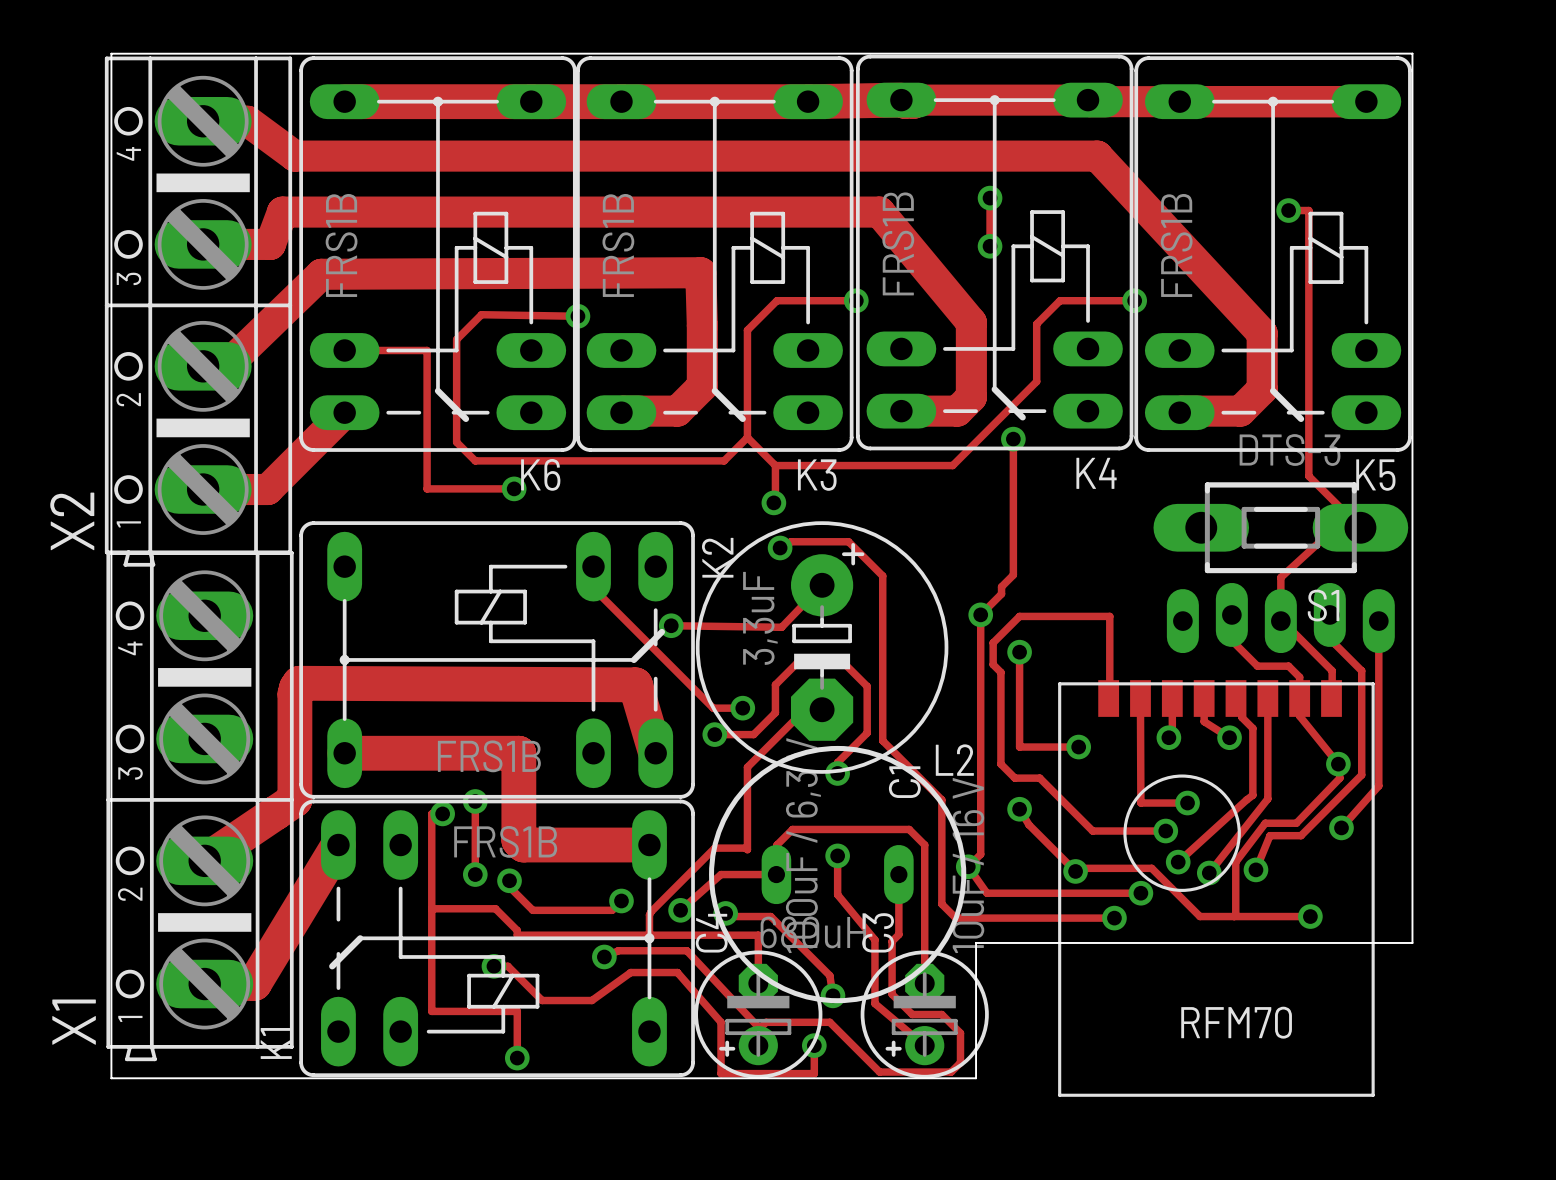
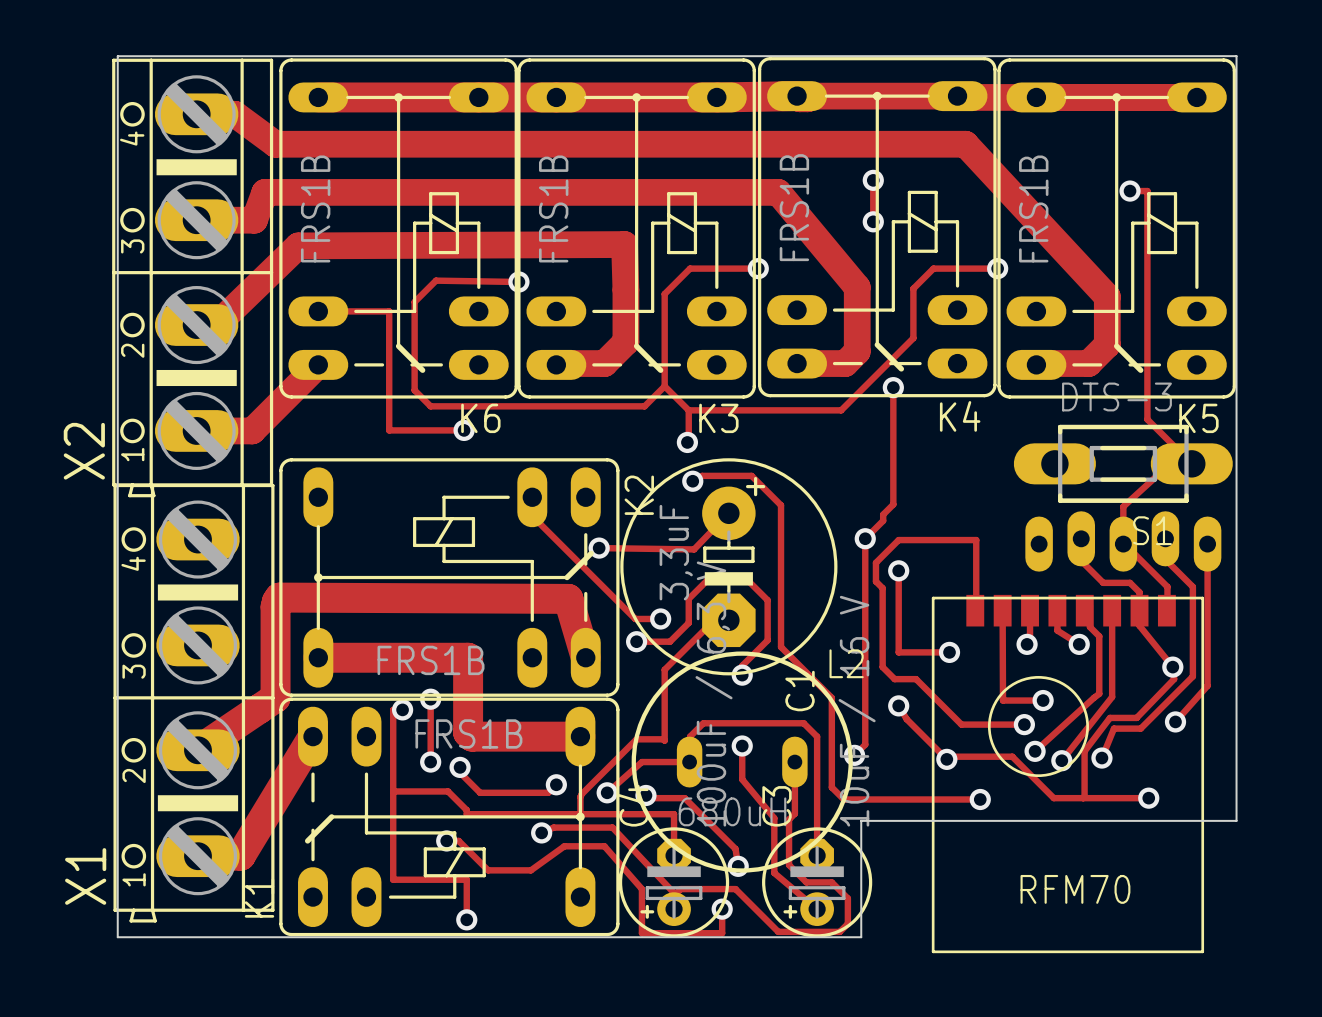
track: (968, 866) (986, 893) (1140, 893) -> none
via: (1140, 893) -> none

